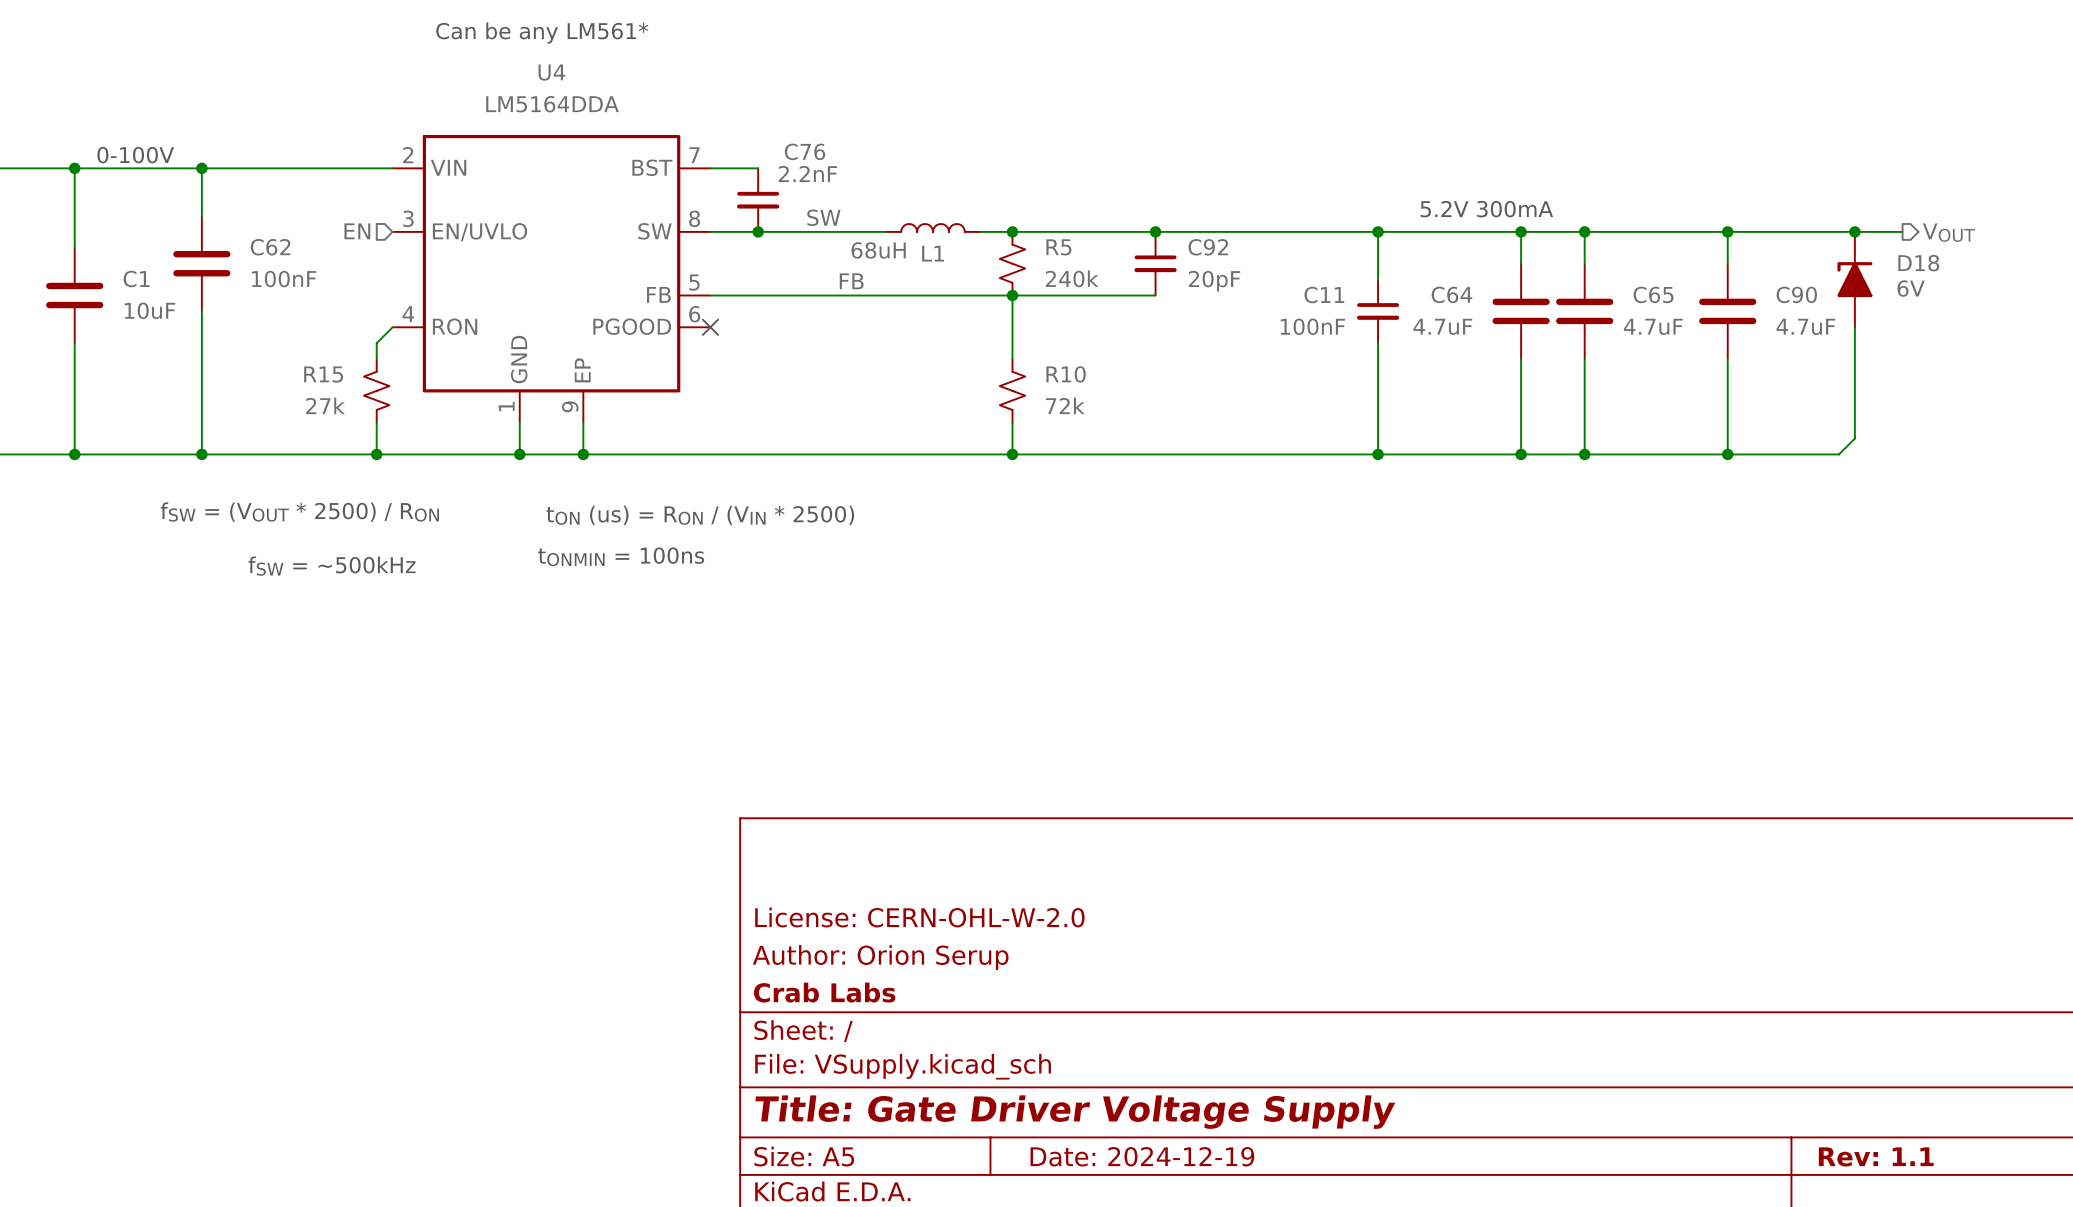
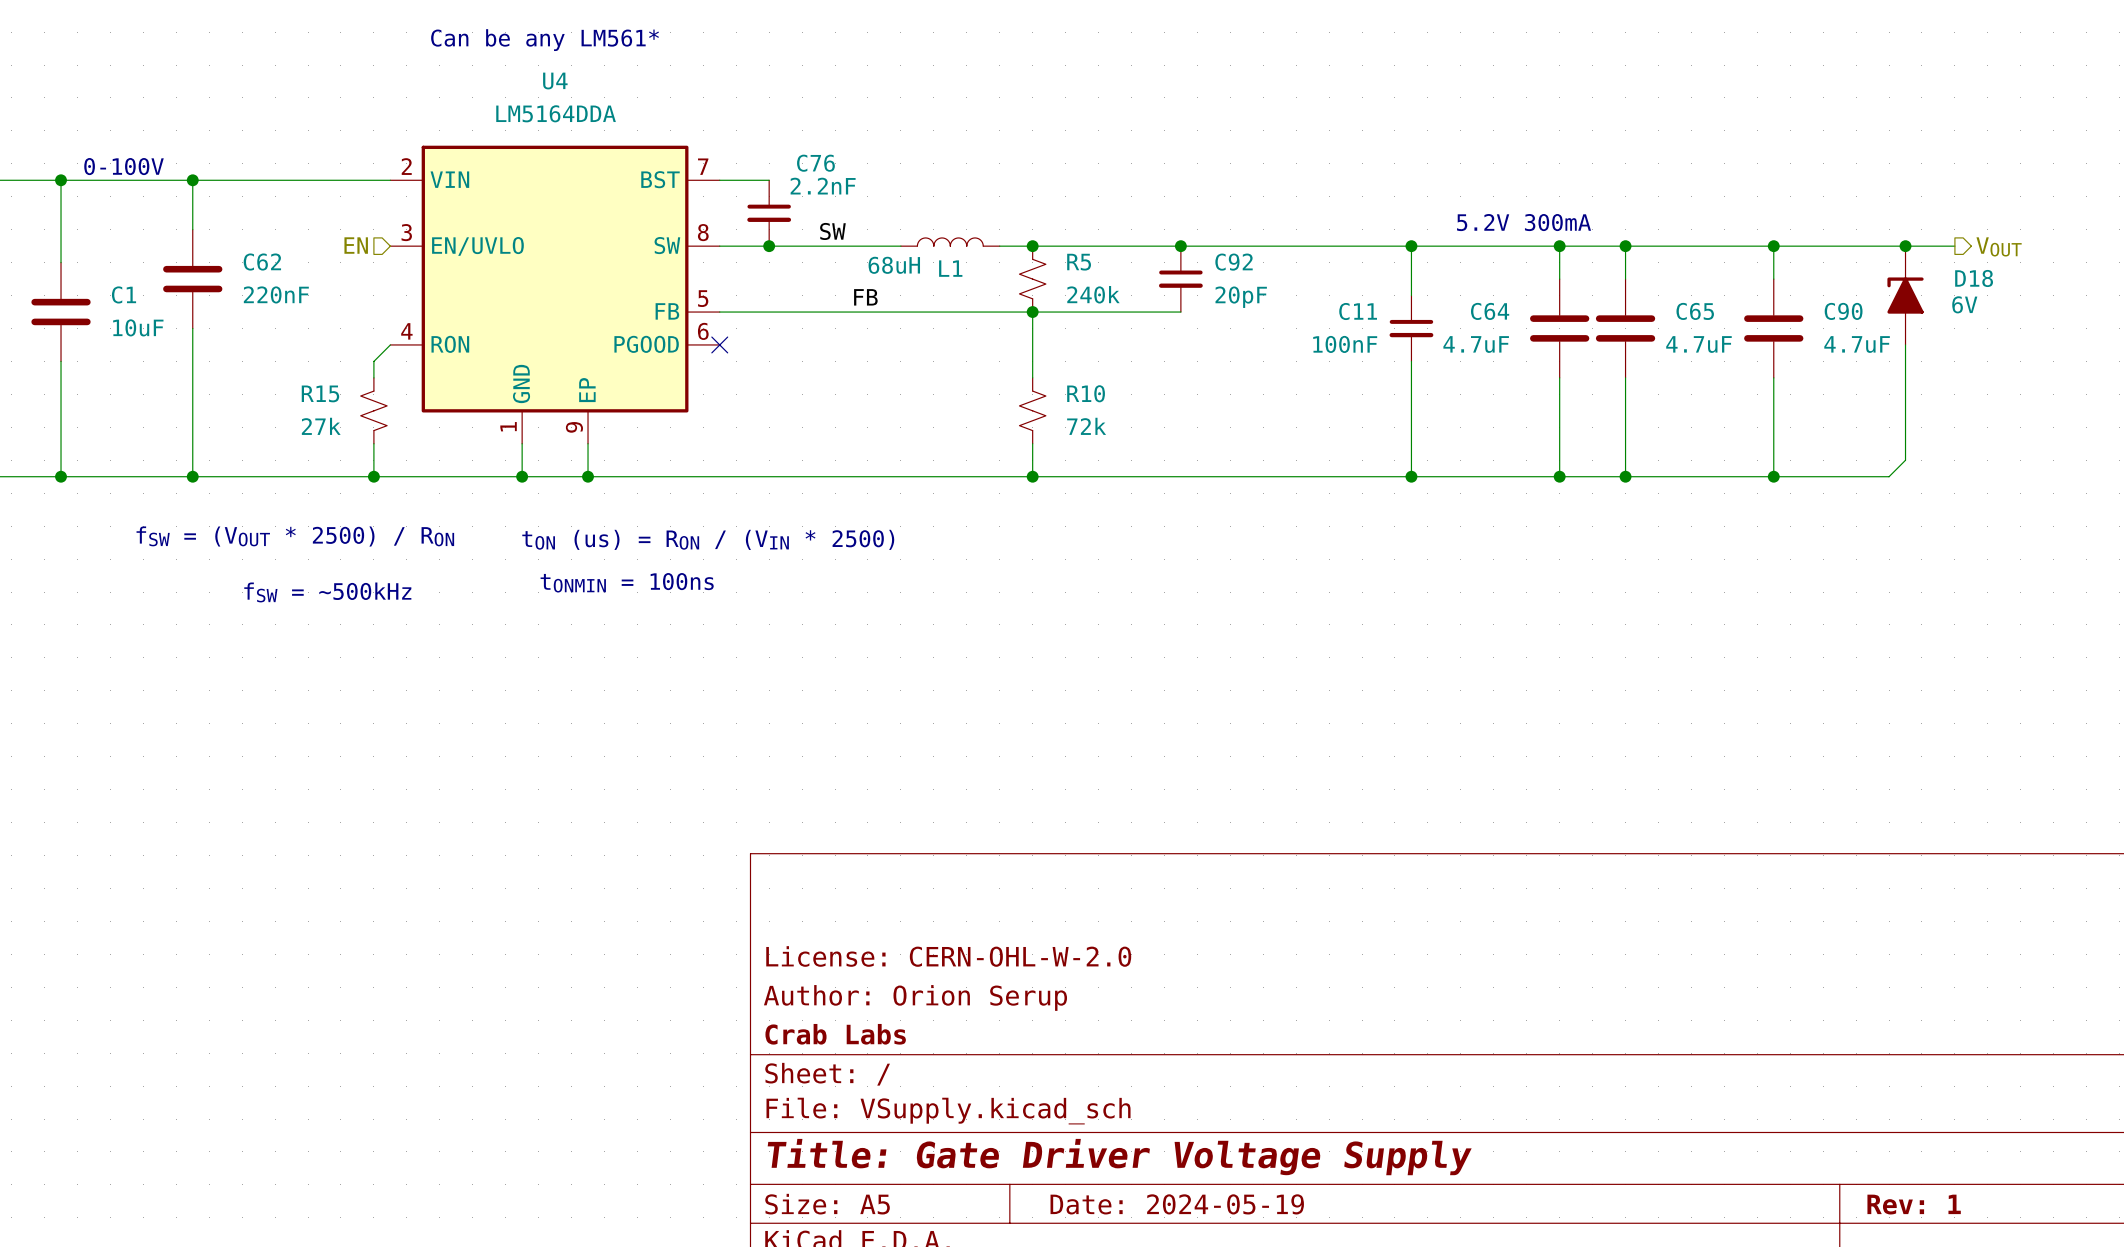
C62 value: 100nF (284, 279) -> 220nF (276, 294)
title block: Date: 2024-12-19 (1142, 1156) -> Date: 2024-05-19 (1177, 1204)
title block: Rev: 1.1 (1876, 1156) -> Rev: 1 (1914, 1204)

